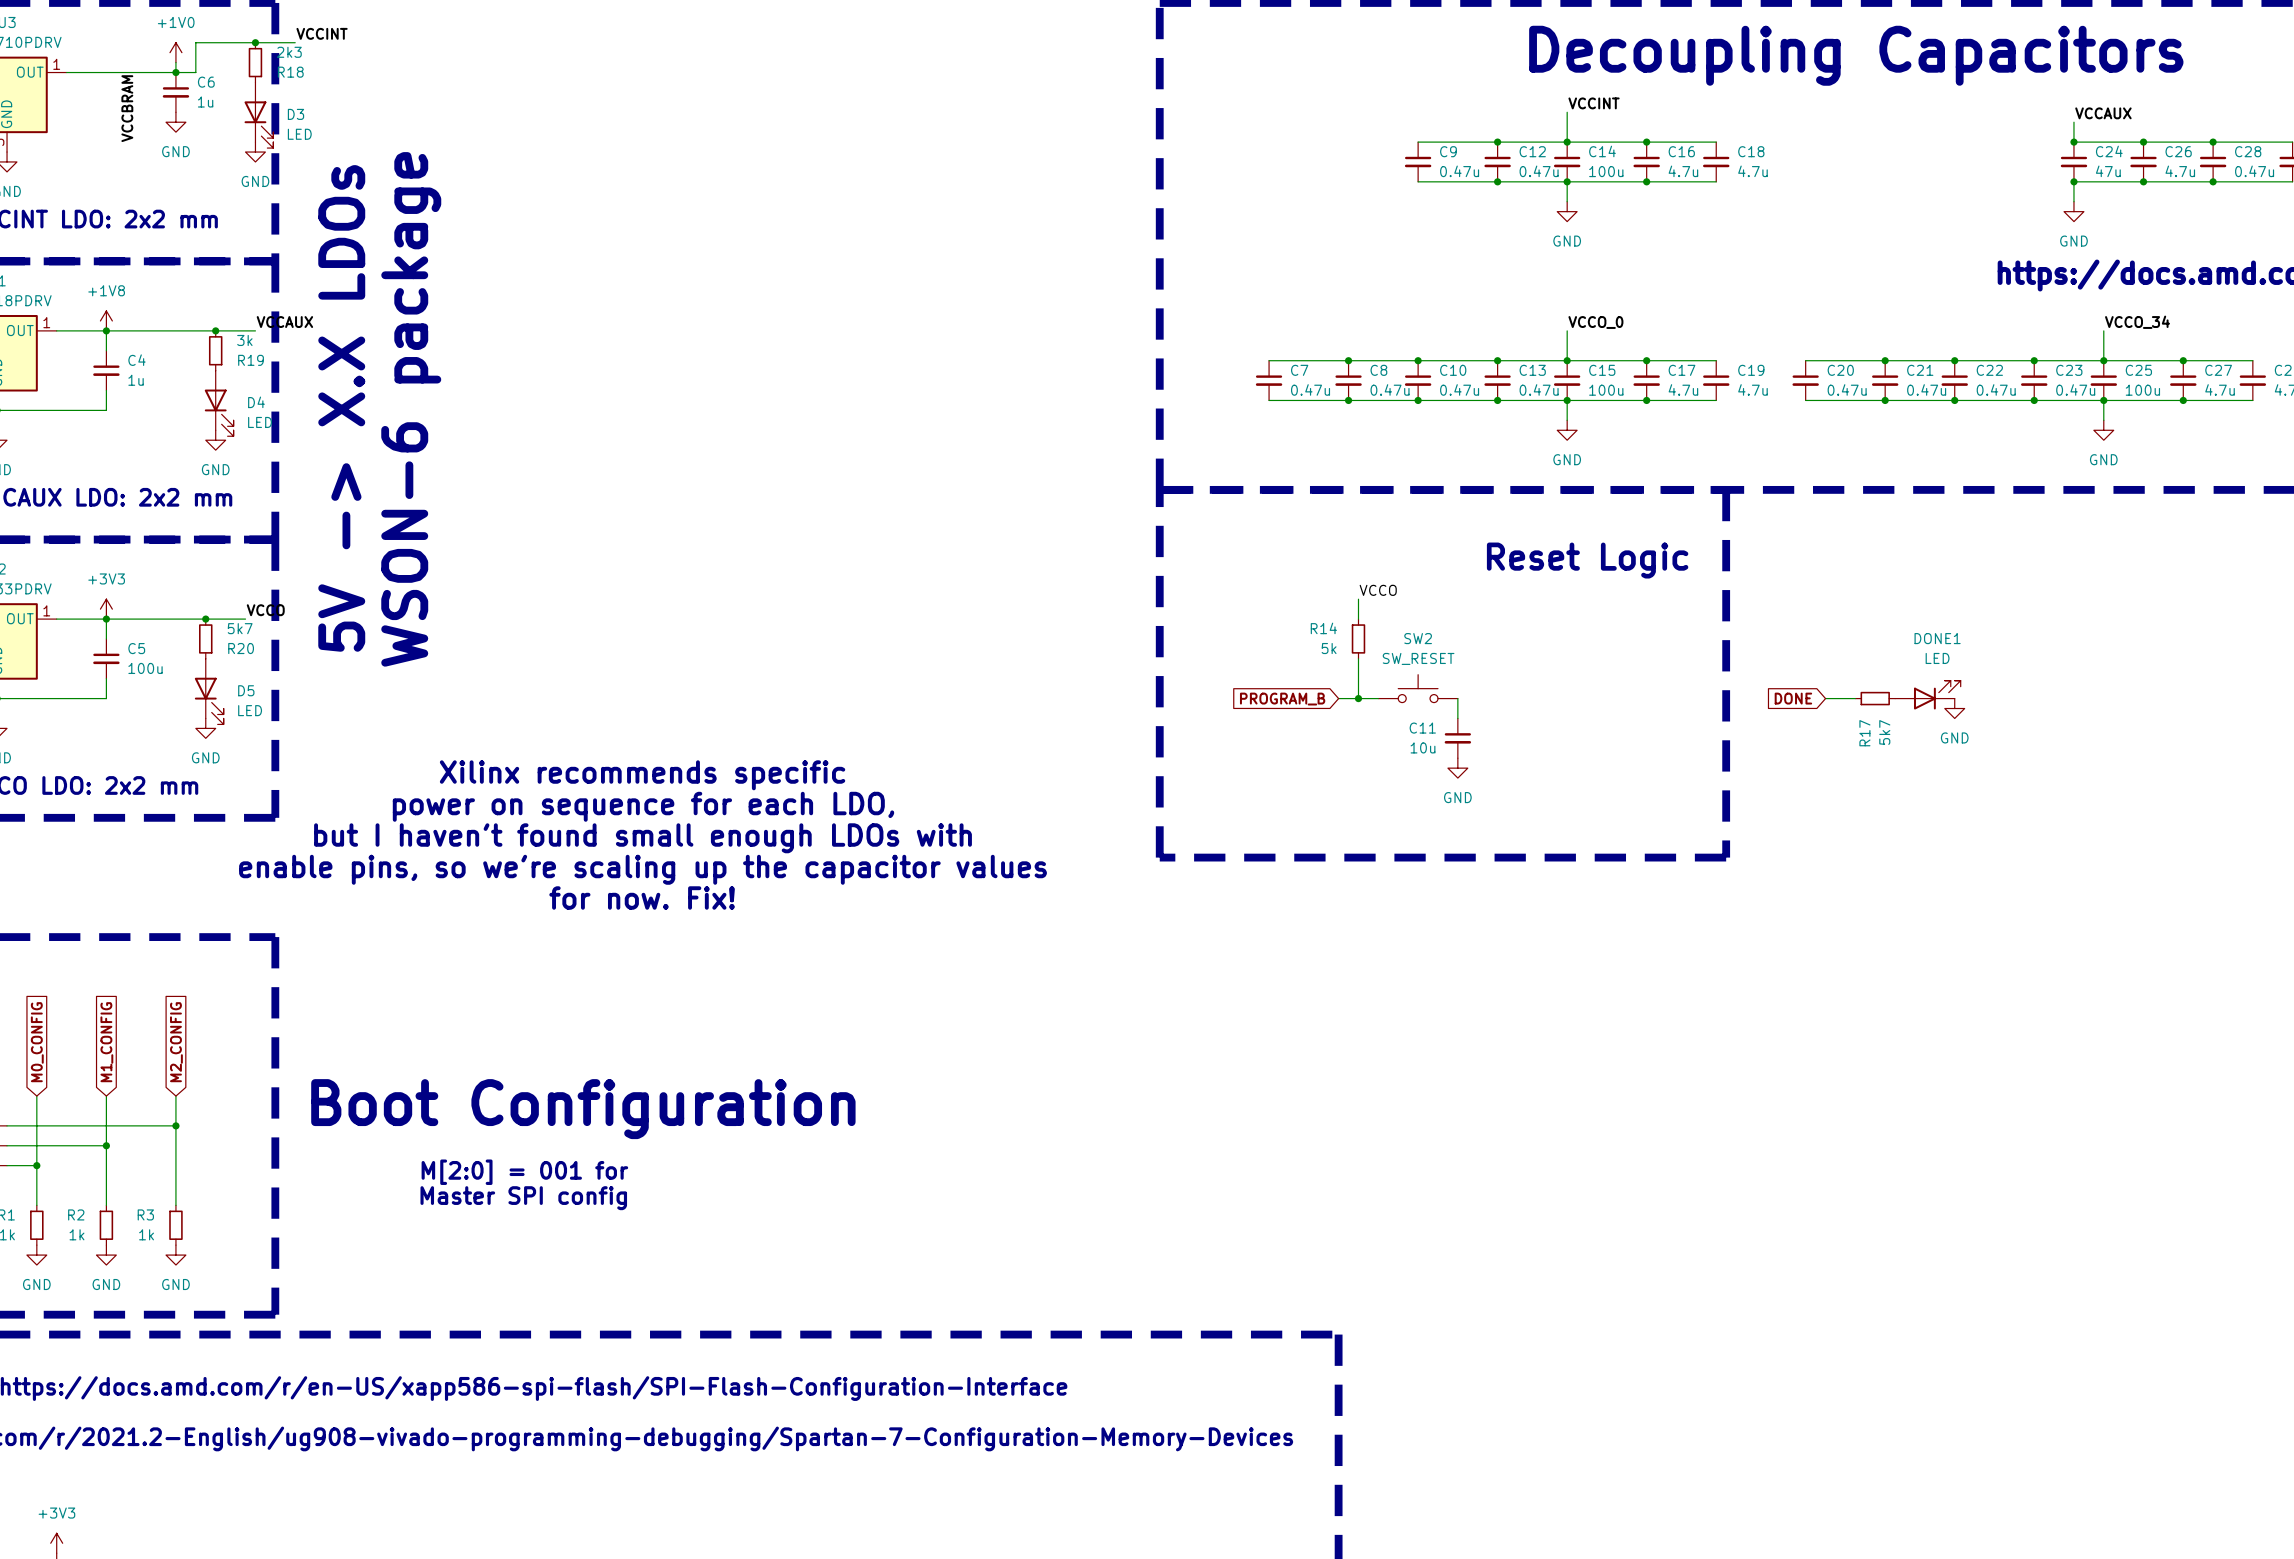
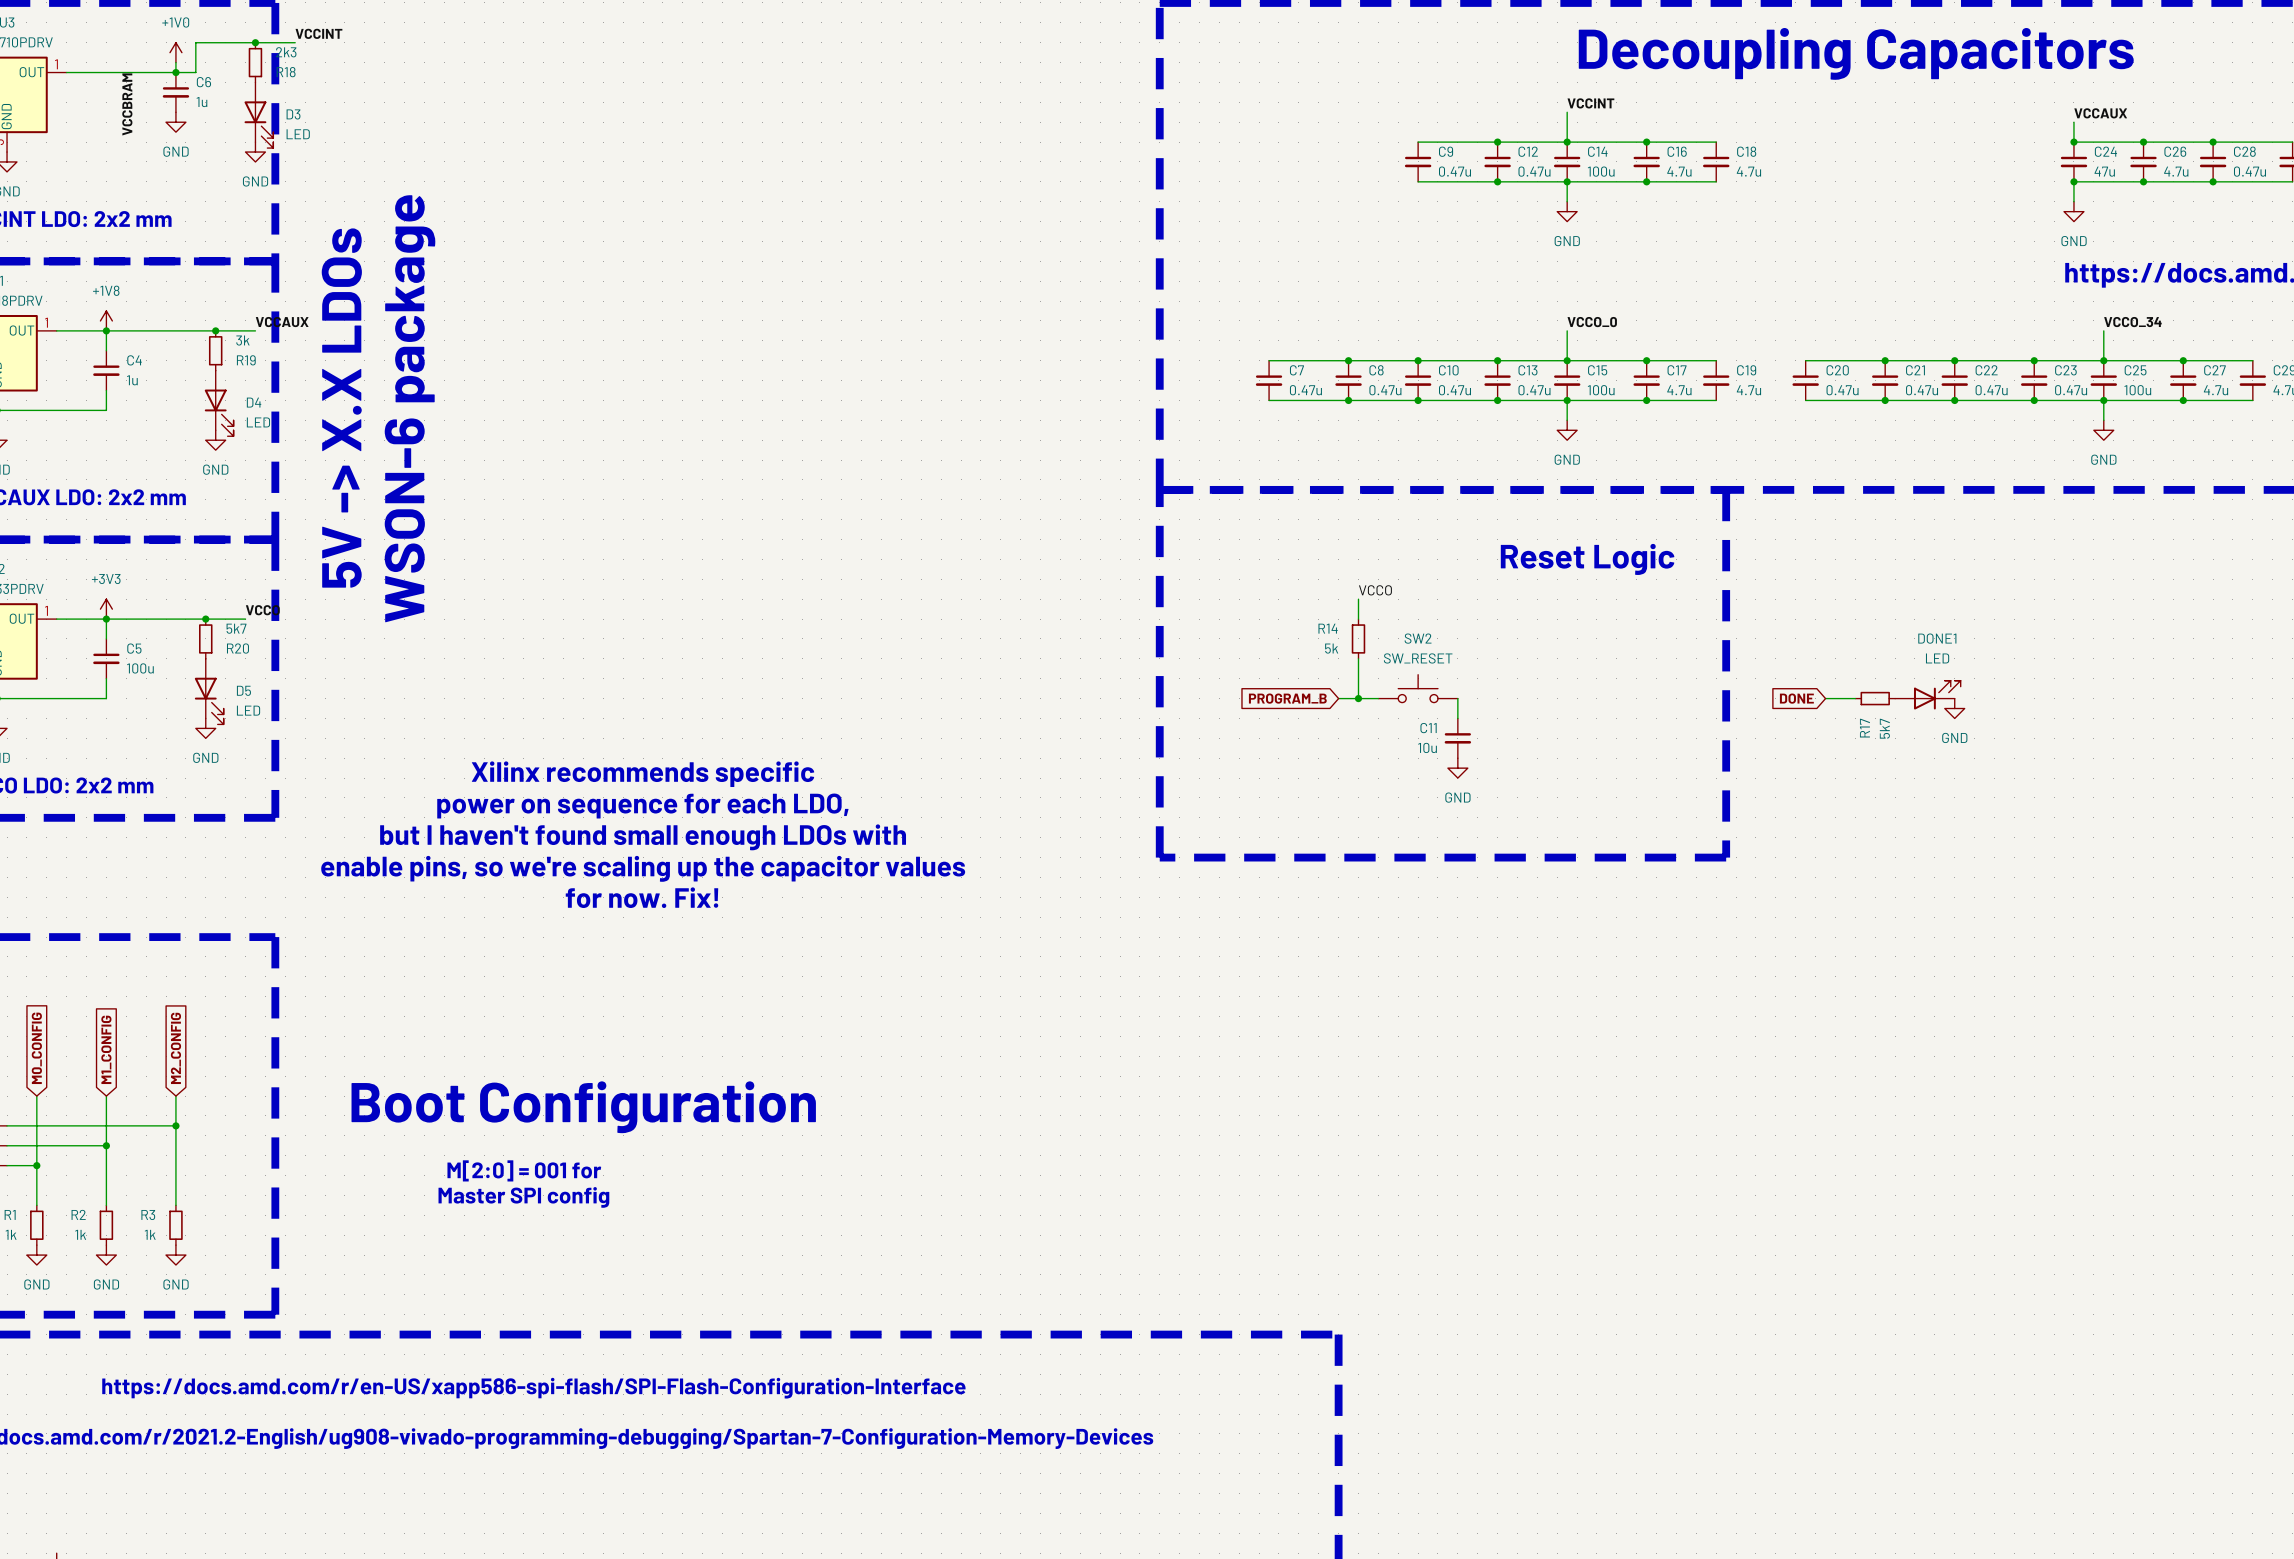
power symbol: +3V3 (56, 1543) -> none

